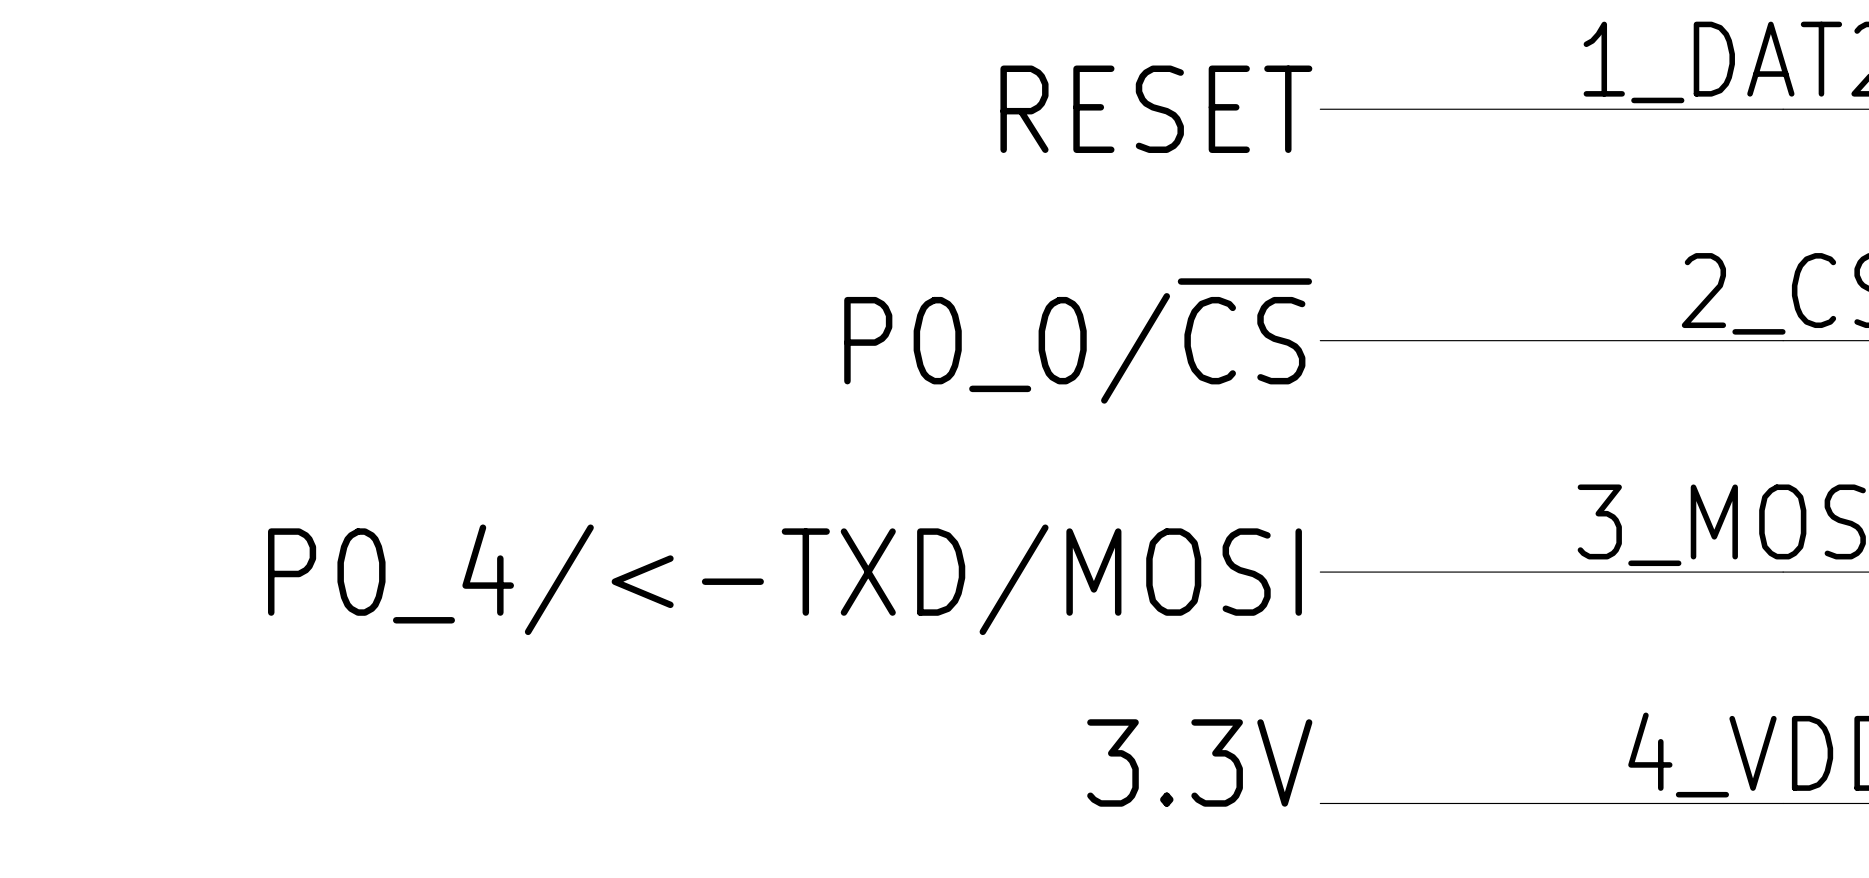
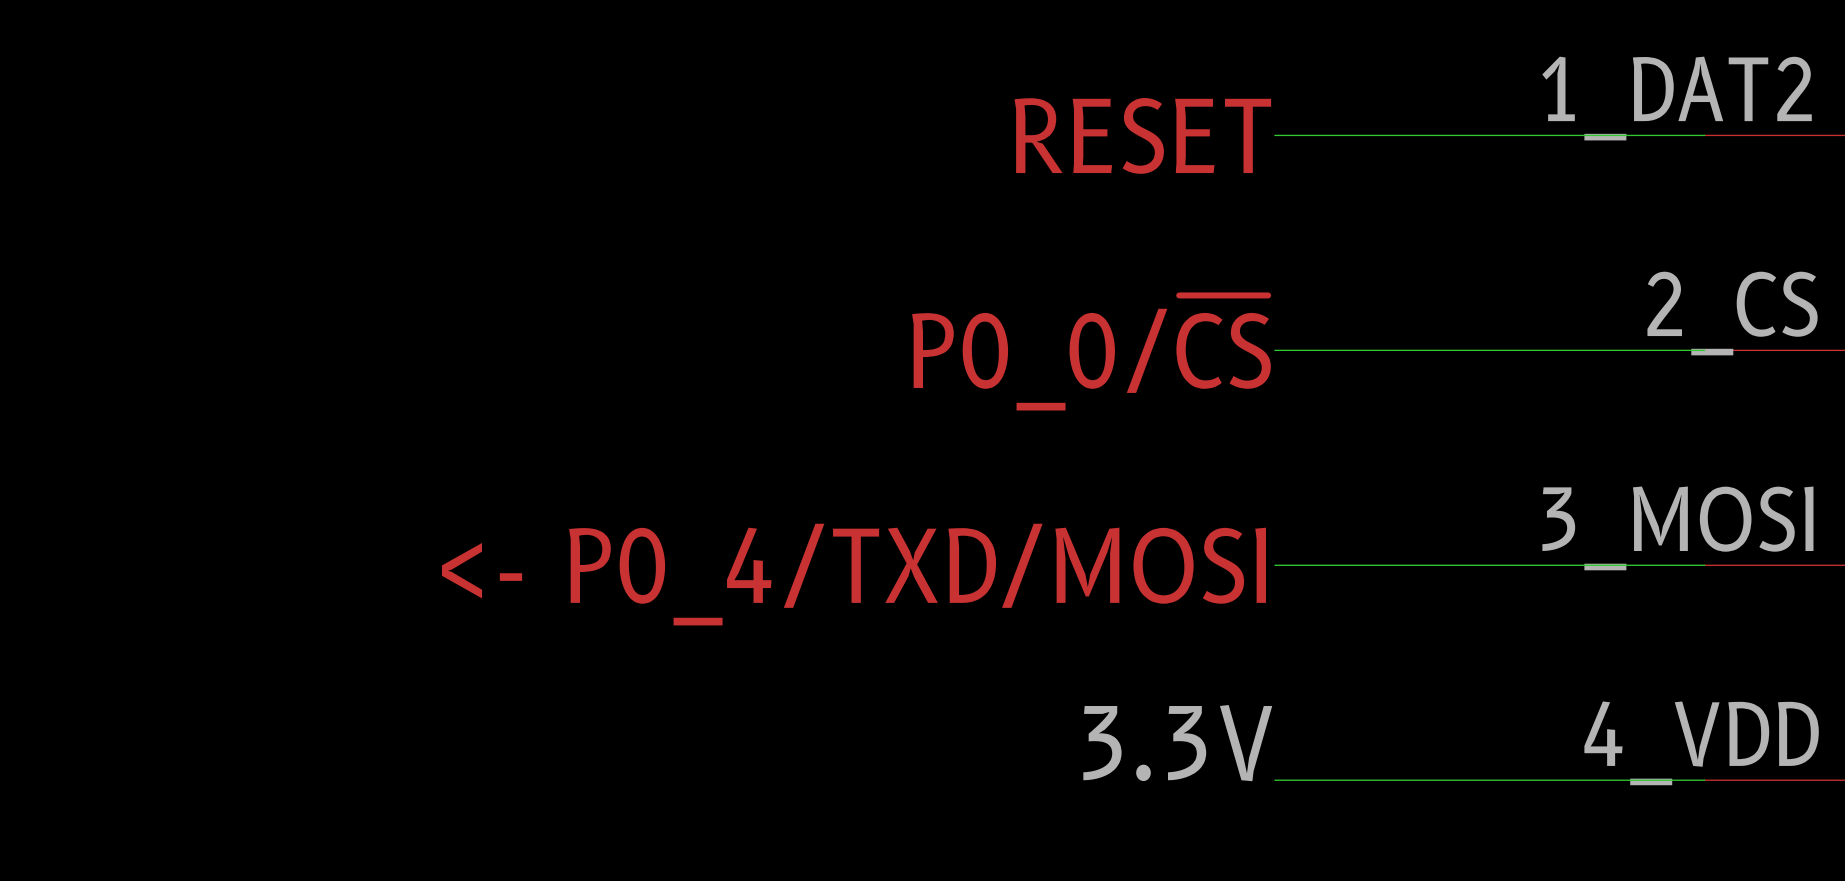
text: P0_4/<-TXD/MOSI (784, 579) -> <- P0_4/TXD/MOSI (853, 574)

